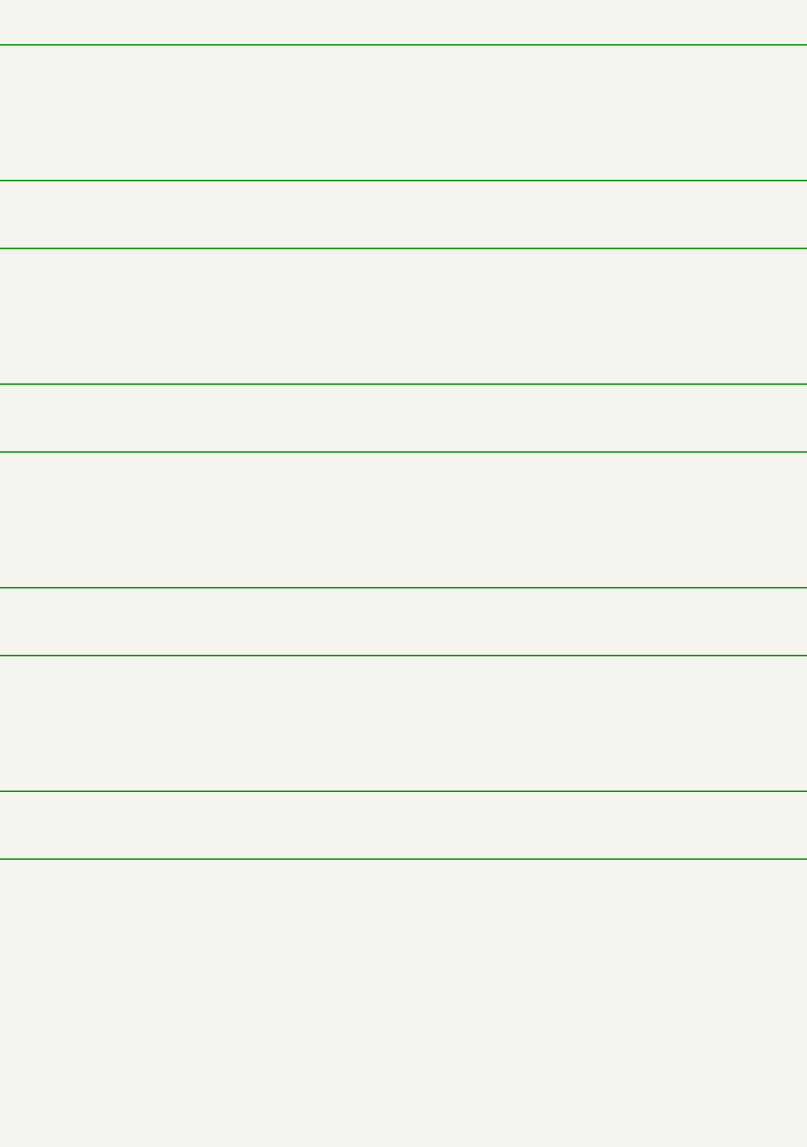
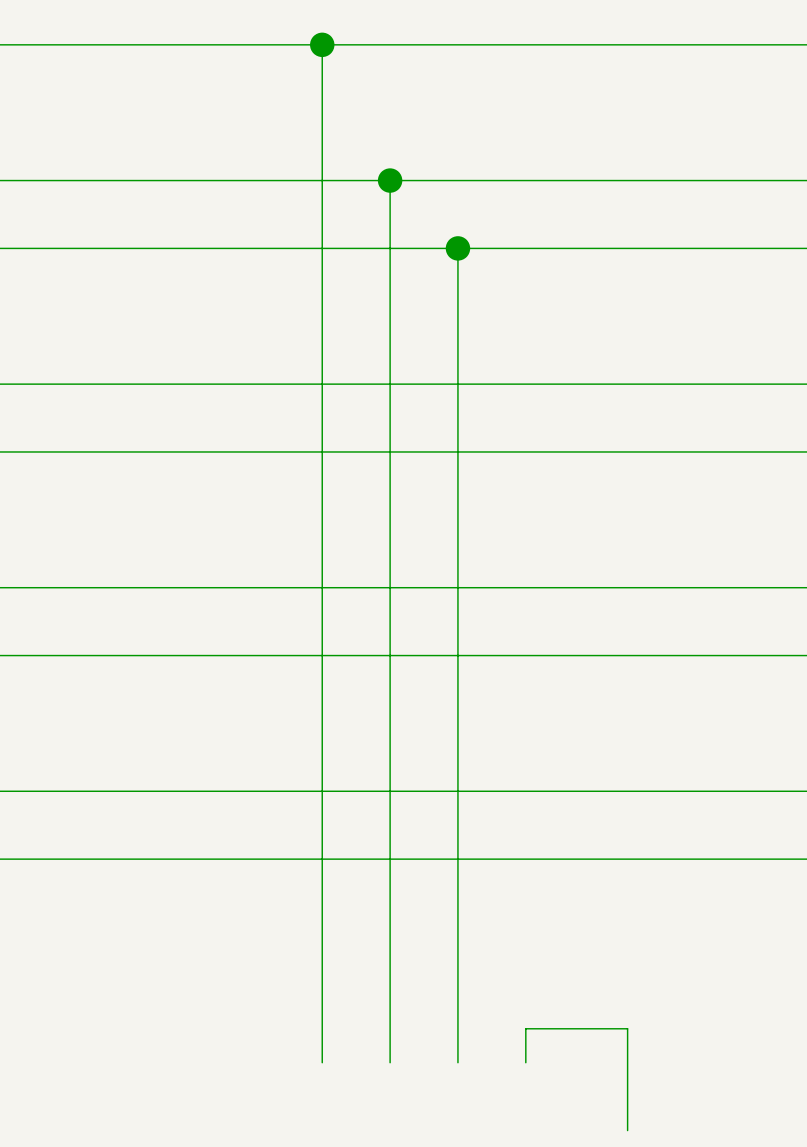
wire: none -> (322, 44) (322, 1062)
junction: none -> (322, 44)
wire: none -> (390, 180) (390, 1062)
junction: none -> (390, 180)
wire: none -> (457, 248) (457, 1062)
junction: none -> (457, 248)
wire: none -> (525, 1062) (525, 1028) (627, 1028) (627, 1130)

